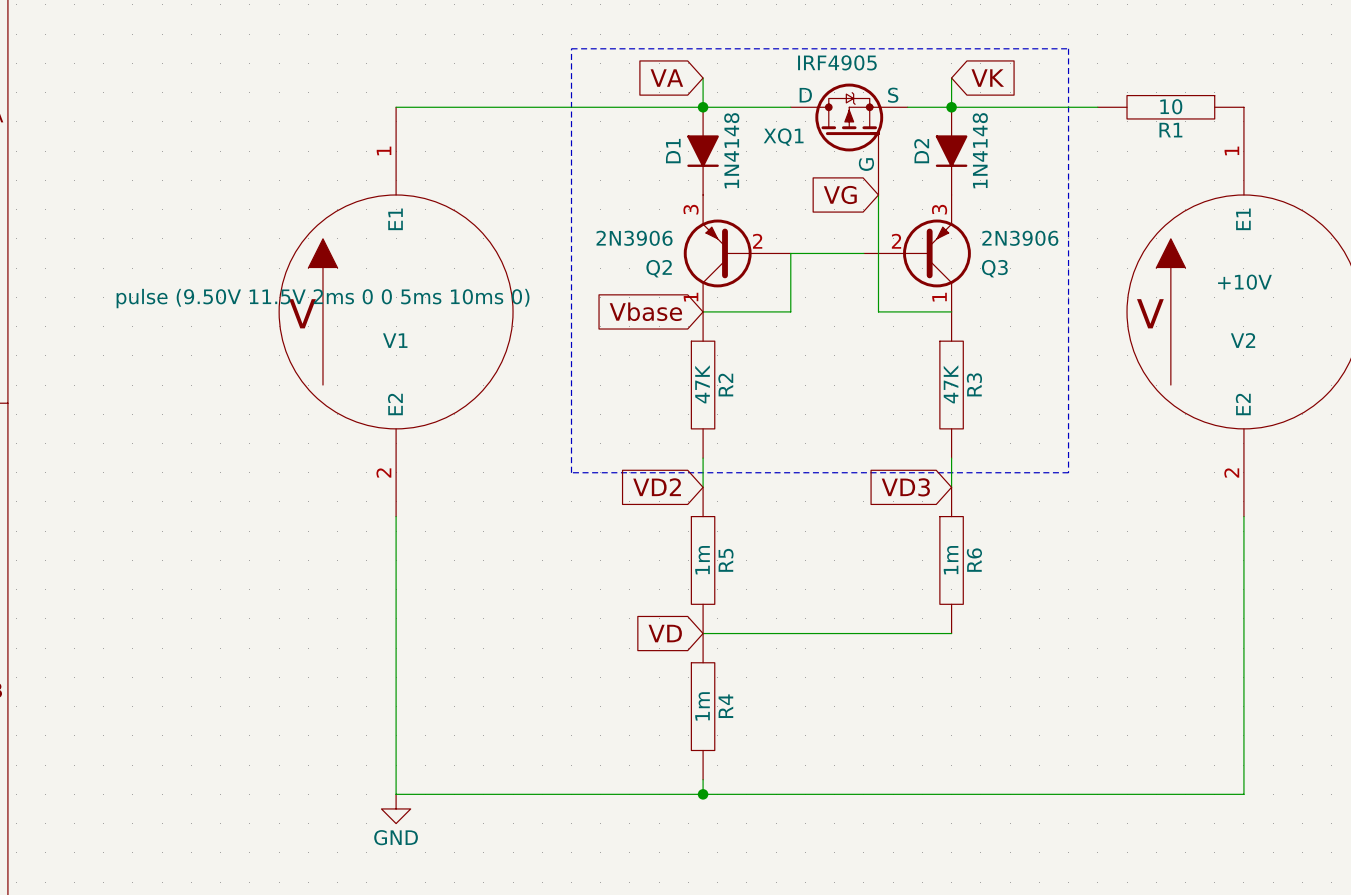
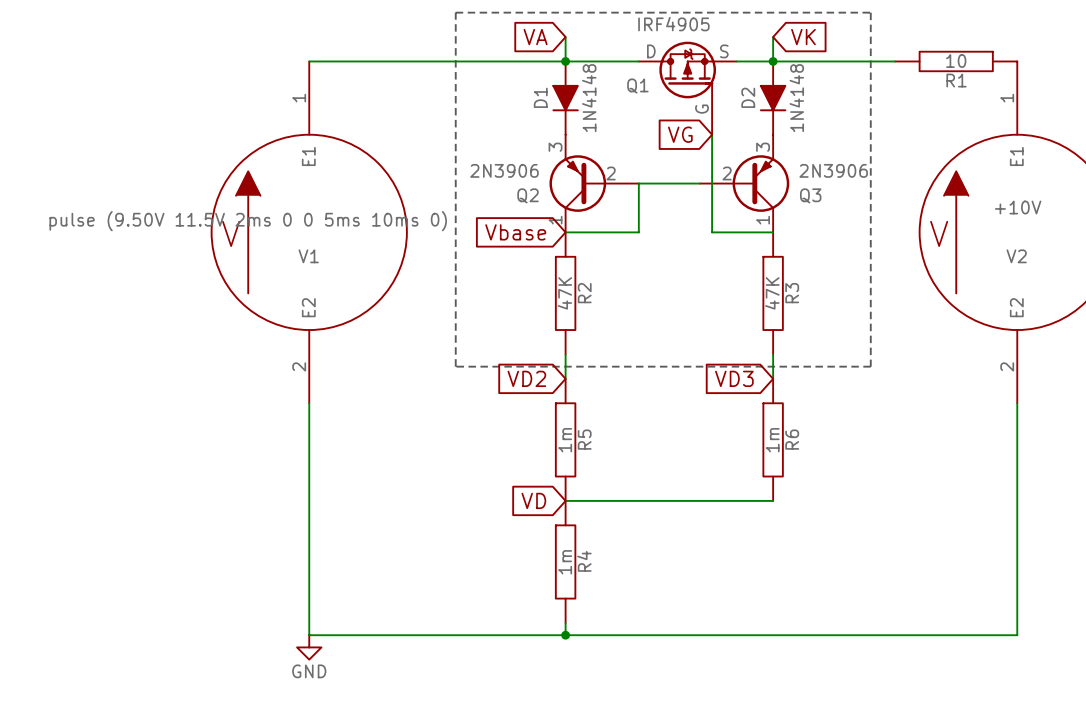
XQ1 name: XQ1 (783, 137) -> Q1 (637, 86)

